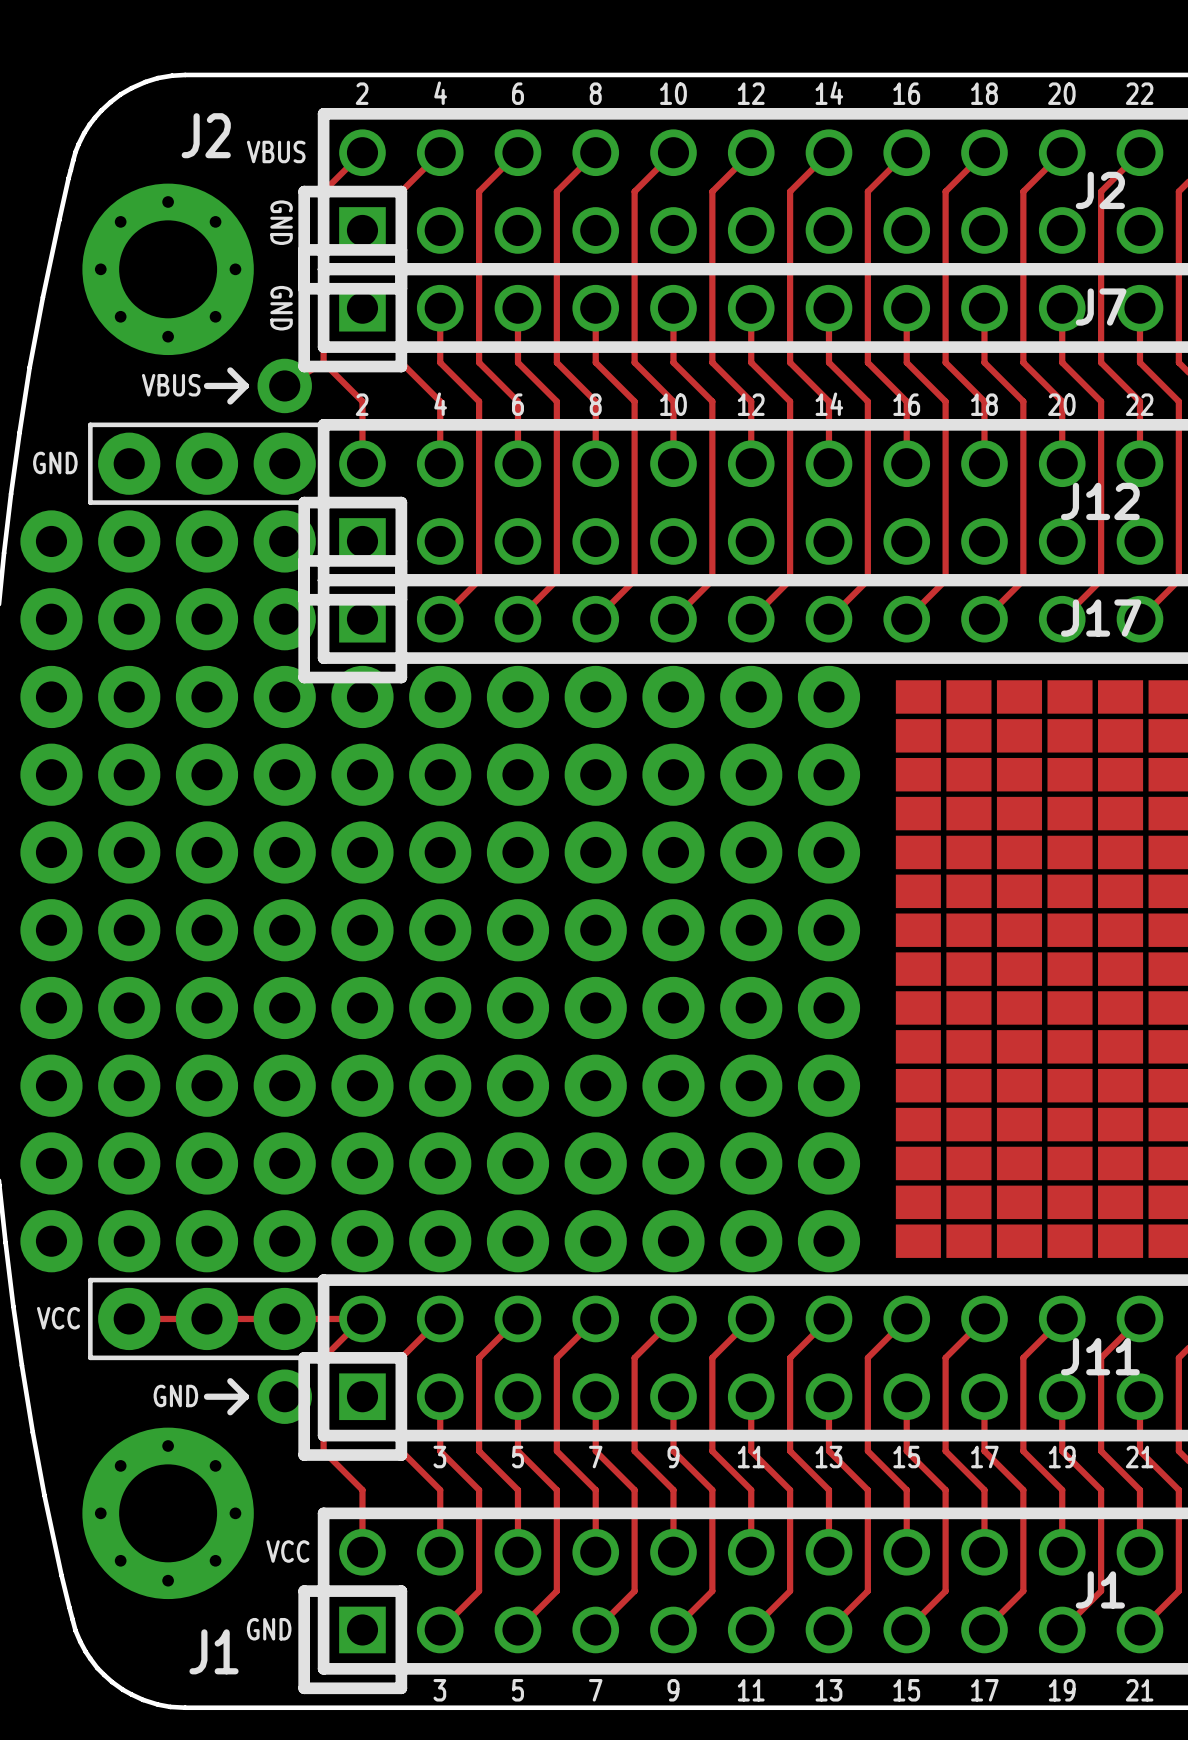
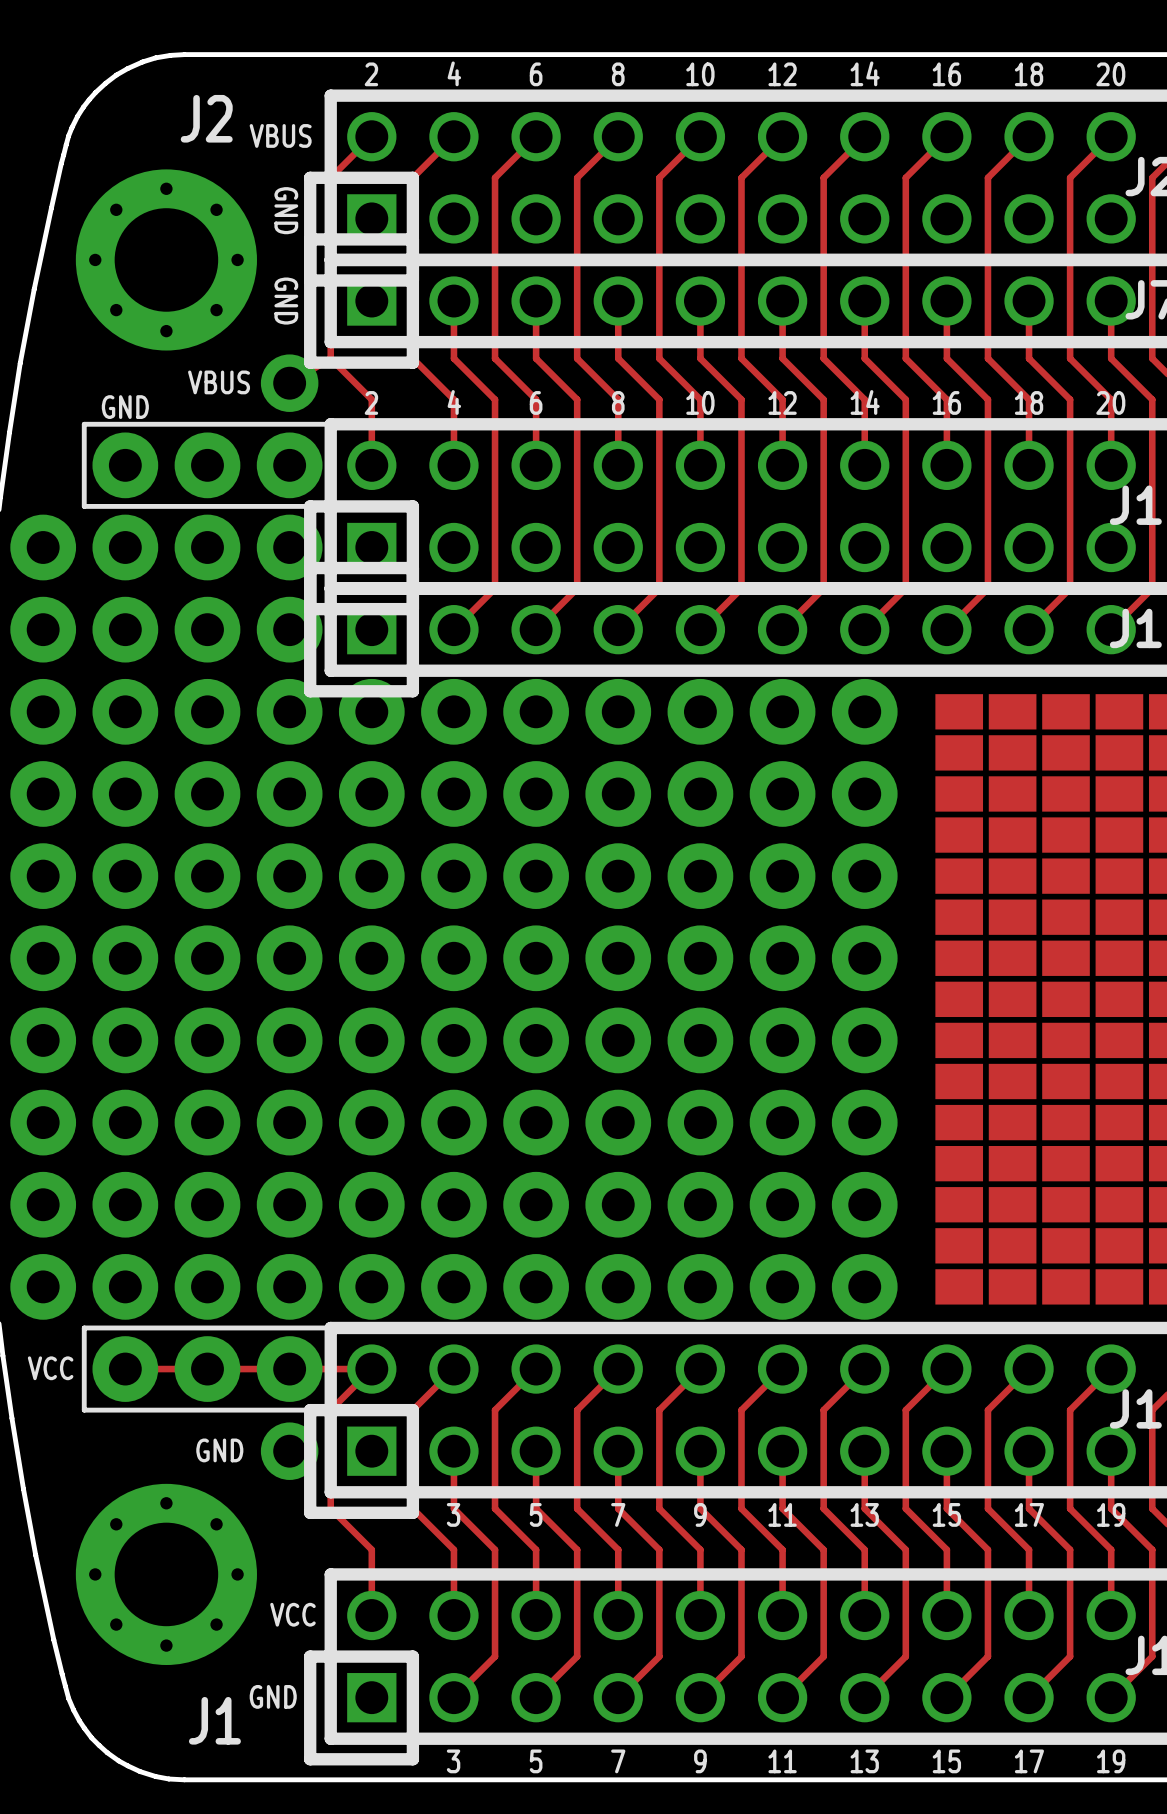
line: (230, 370) (245, 385) -> none
text position: VBUS (171, 385) -> VBUS (219, 382)
line: (206, 385) (245, 385) -> none
line: (245, 385) (230, 401) -> none
text position: GND (55, 462) -> GND (125, 407)
line: (230, 1381) (245, 1396) -> none
text position: GND (175, 1395) -> GND (219, 1450)
line: (206, 1396) (245, 1396) -> none
line: (245, 1396) (230, 1412) -> none

